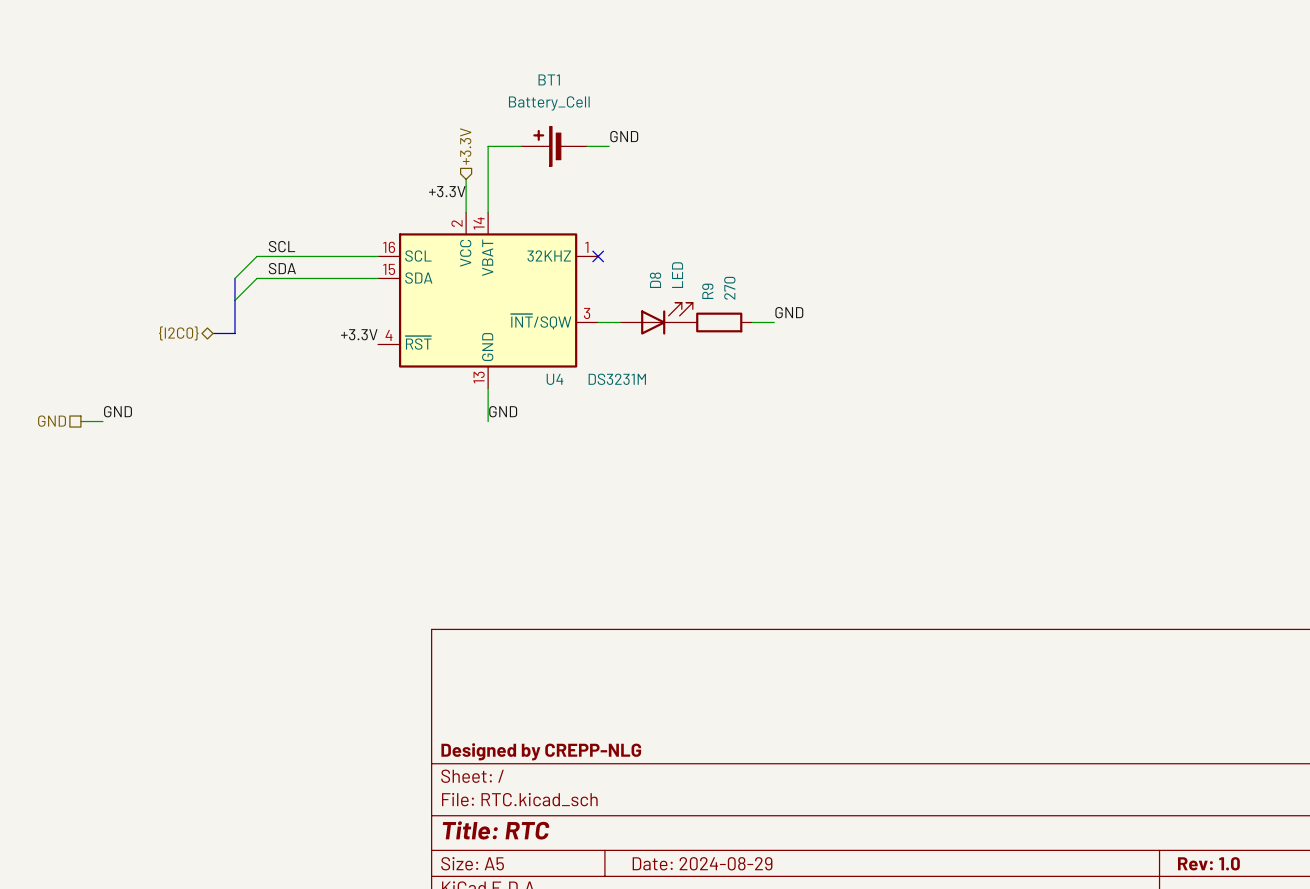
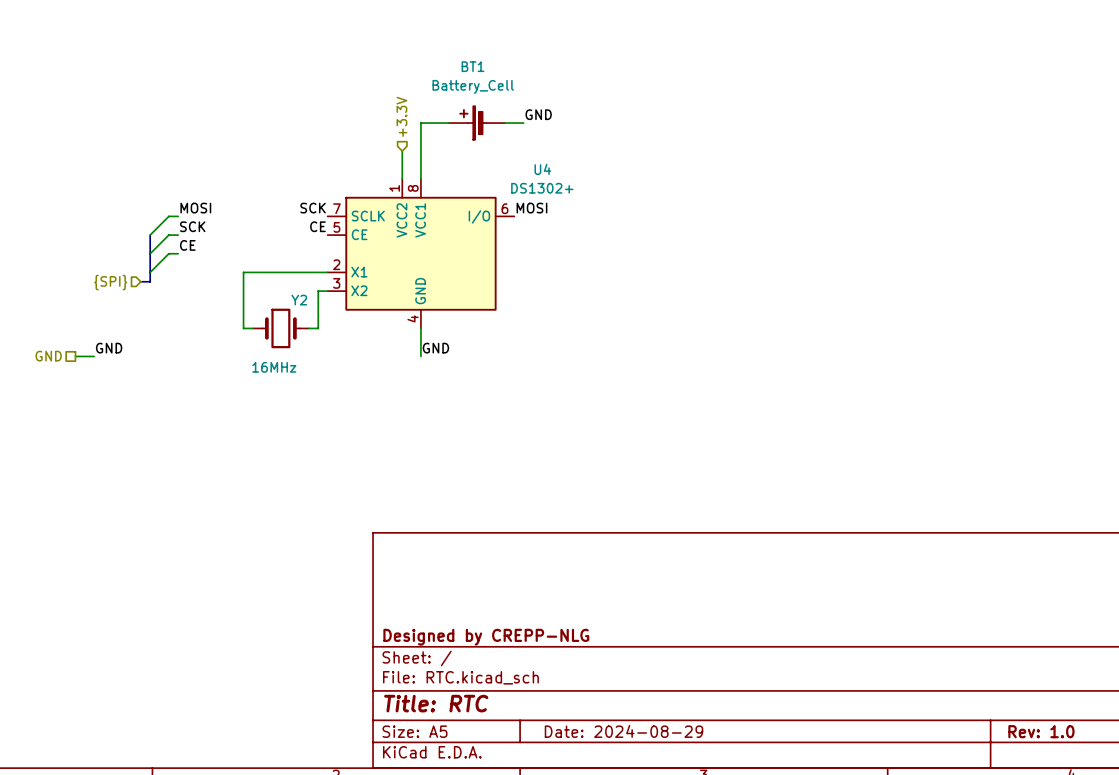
label: +3.3V (447, 191) -> none
U4 symbol: [378, 212, 599, 389] -> [327, 179, 515, 329]
label: none -> MOSI (195, 208)
label: SCL (281, 246) -> none
label: none -> SCK (313, 208)
label: none -> MOSI (531, 208)
wire: none -> (178, 216) (168, 216) (150, 235)
wire: (378, 256) (257, 256) (234, 278) -> none
no-connect mark: (598, 256) -> none
label: none -> SCK (192, 226)
label: SDA (282, 268) -> none
label: none -> CE (317, 226)
bus: none -> (150, 235) (150, 281) (140, 281)
wire: none -> (178, 235) (168, 235) (150, 253)
bus: (234, 278) (234, 333) (212, 333) -> none
wire: (378, 278) (257, 278) (234, 300) -> none
label: none -> CE (187, 245)
wire: none -> (178, 253) (168, 253) (150, 272)
label: GND (789, 312) -> none
D8: LED (656, 318) -> none
wire: none -> (327, 272) (243, 272) (243, 328) (252, 328)
wire: (598, 322) (620, 322) -> none
R9: 270 (719, 322) -> none
wire: (752, 322) (774, 322) -> none
hierarchical label: none -> {SPI} (110, 282)
hierarchical label: {I2C0} (178, 333) -> none
label: +3.3V (359, 334) -> none
wire: none -> (327, 291) (318, 291) (318, 328) (308, 328)
U4 name position: U4 (554, 379) -> U4 (542, 169)
U4 value: DS3231M (617, 379) -> DS1302+ (542, 188)
Y2: none -> 16MHz (280, 328)

